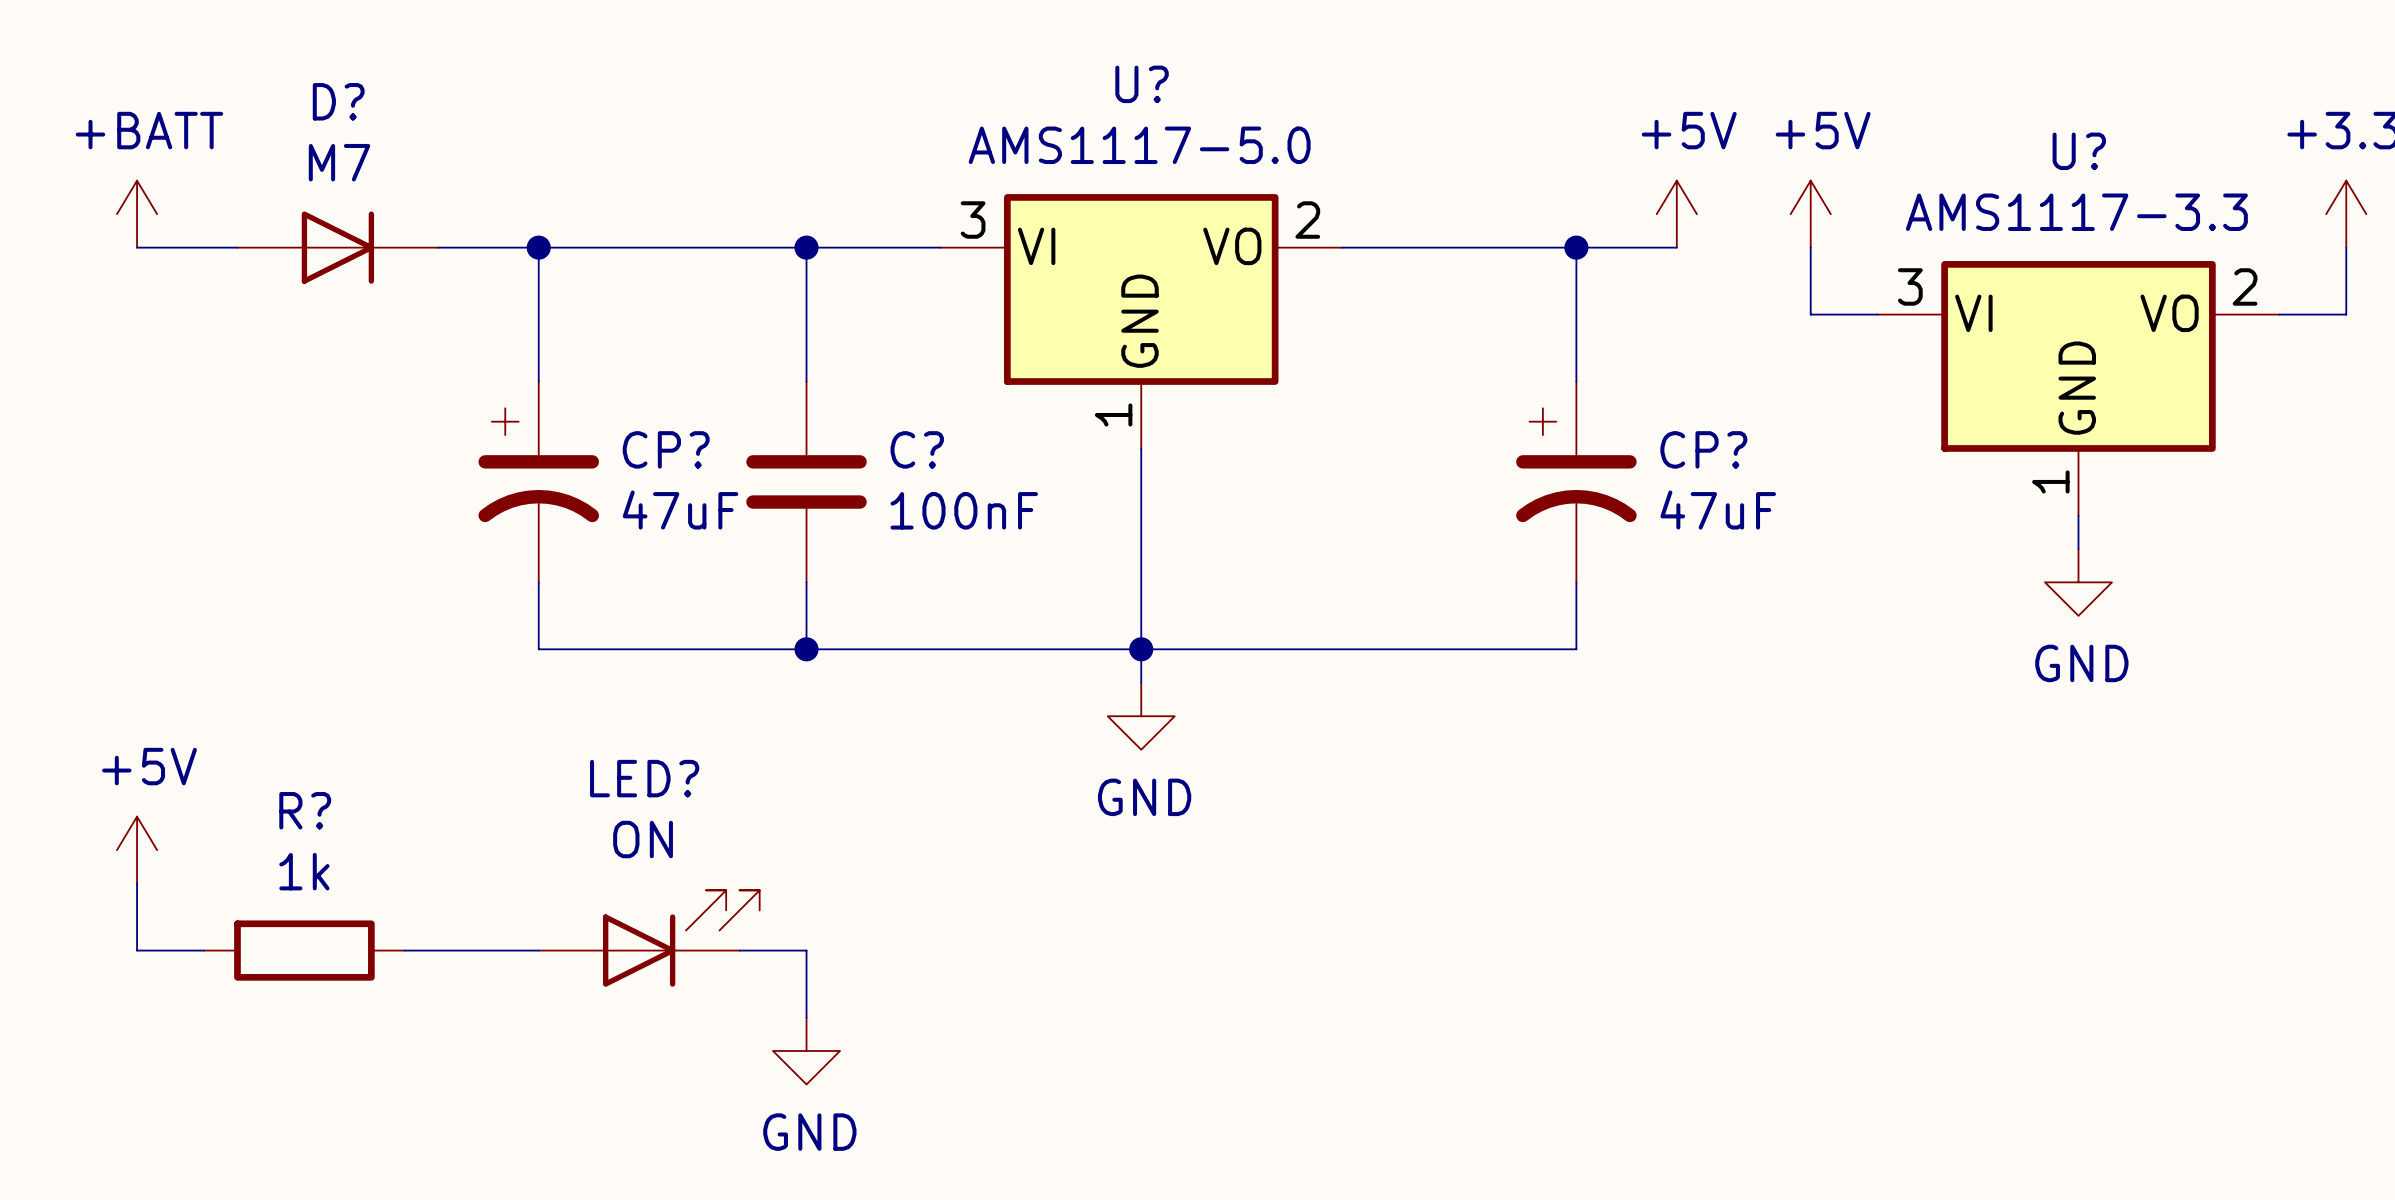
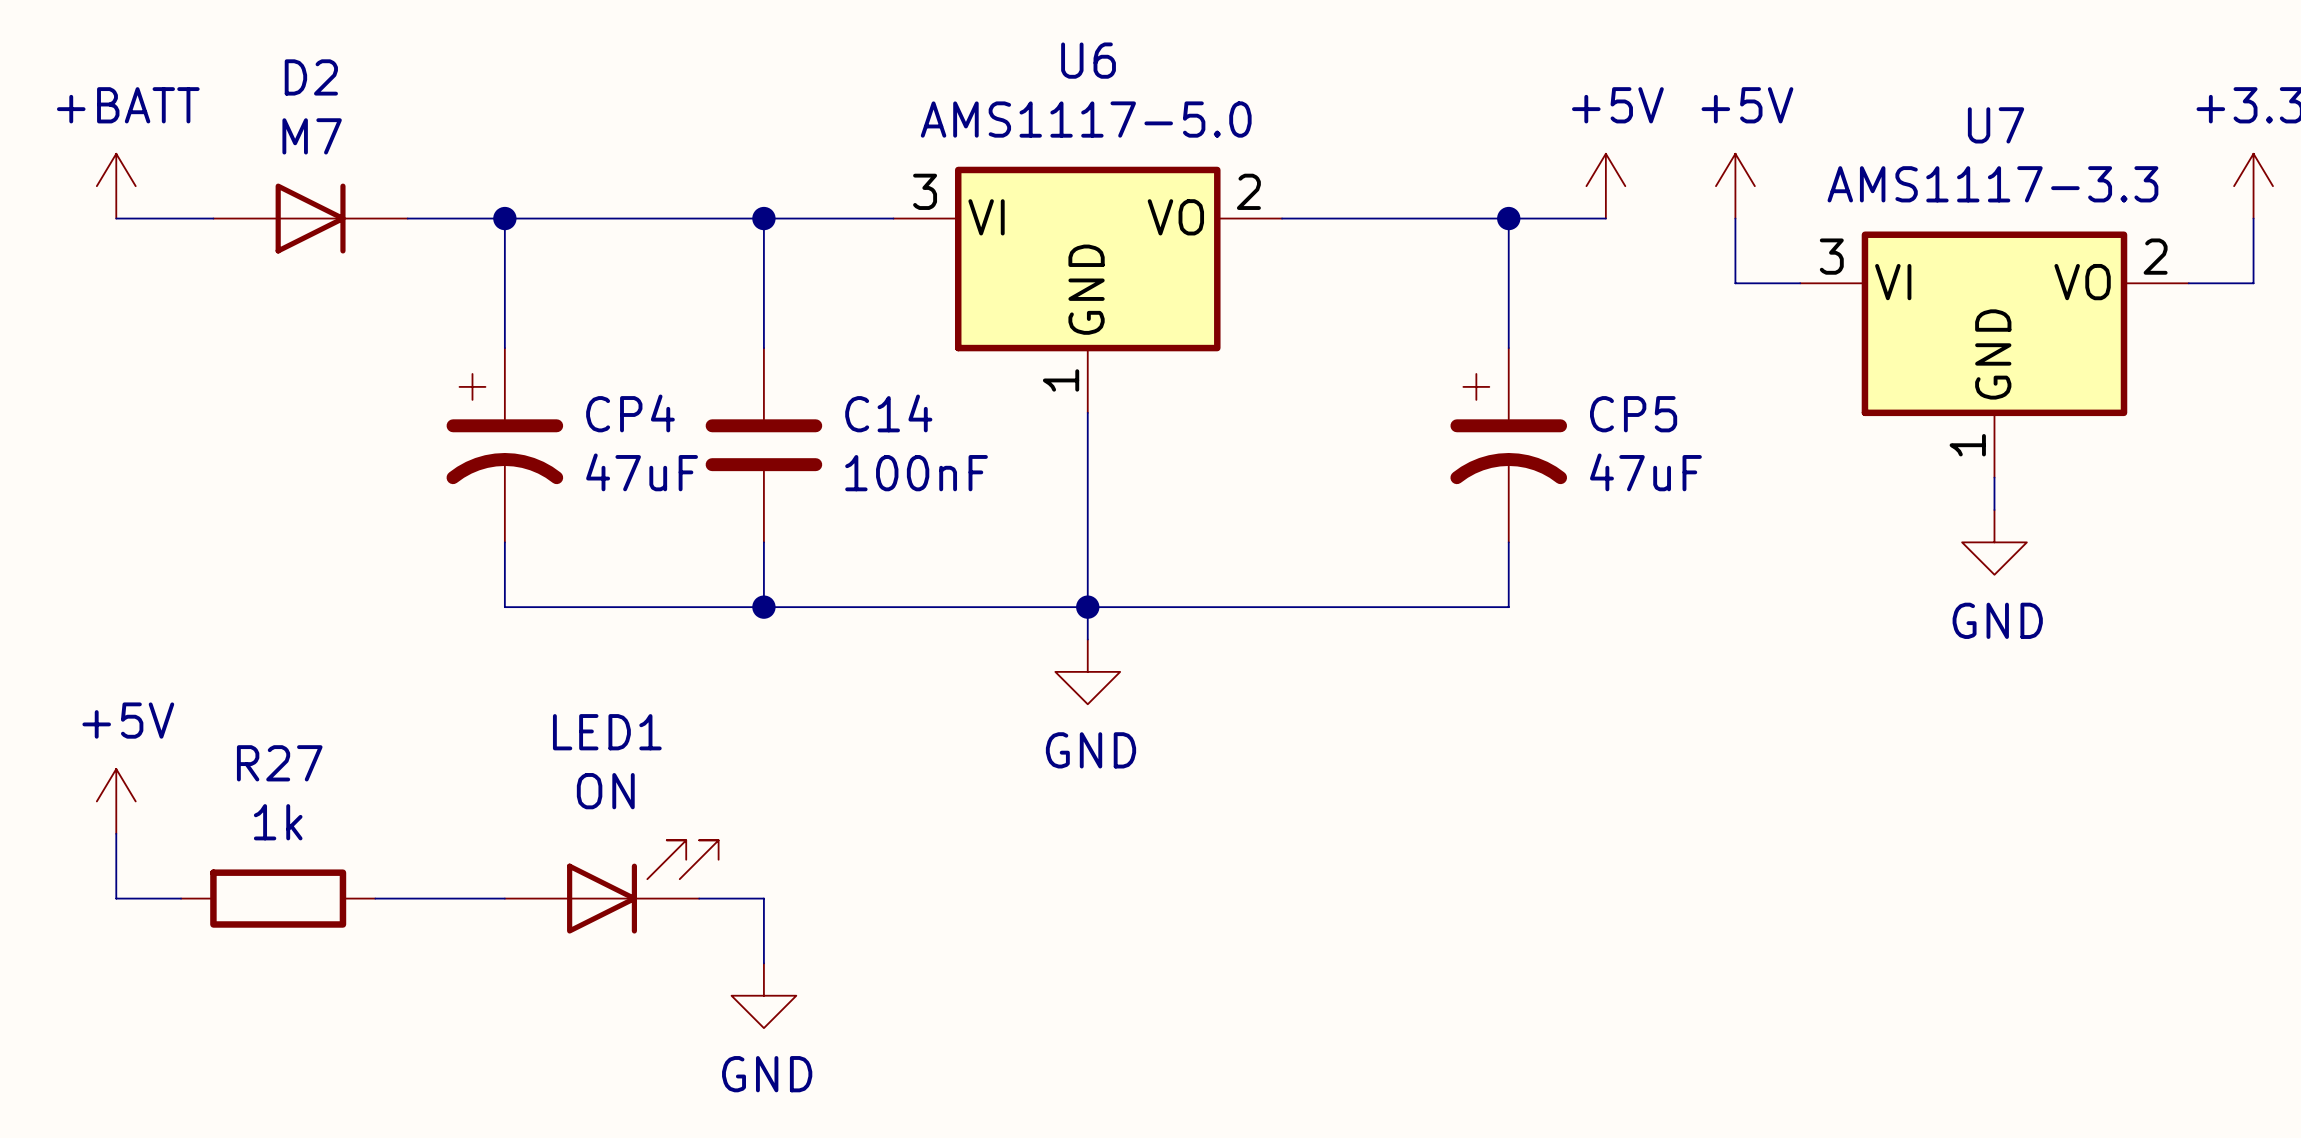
U? name: U? (1142, 84) -> U6 (1088, 60)
D? name: D? (338, 101) -> D2 (311, 77)
U? name: U? (2079, 151) -> U7 (1996, 125)
CP? name: CP? (666, 449) -> CP4 (630, 413)
C? name: C? (917, 449) -> C14 (888, 413)
CP? name: CP? (1703, 449) -> CP5 (1633, 414)
LED? name: LED? (644, 778) -> LED1 (607, 732)
R? name: R? (305, 810) -> R27 (279, 763)

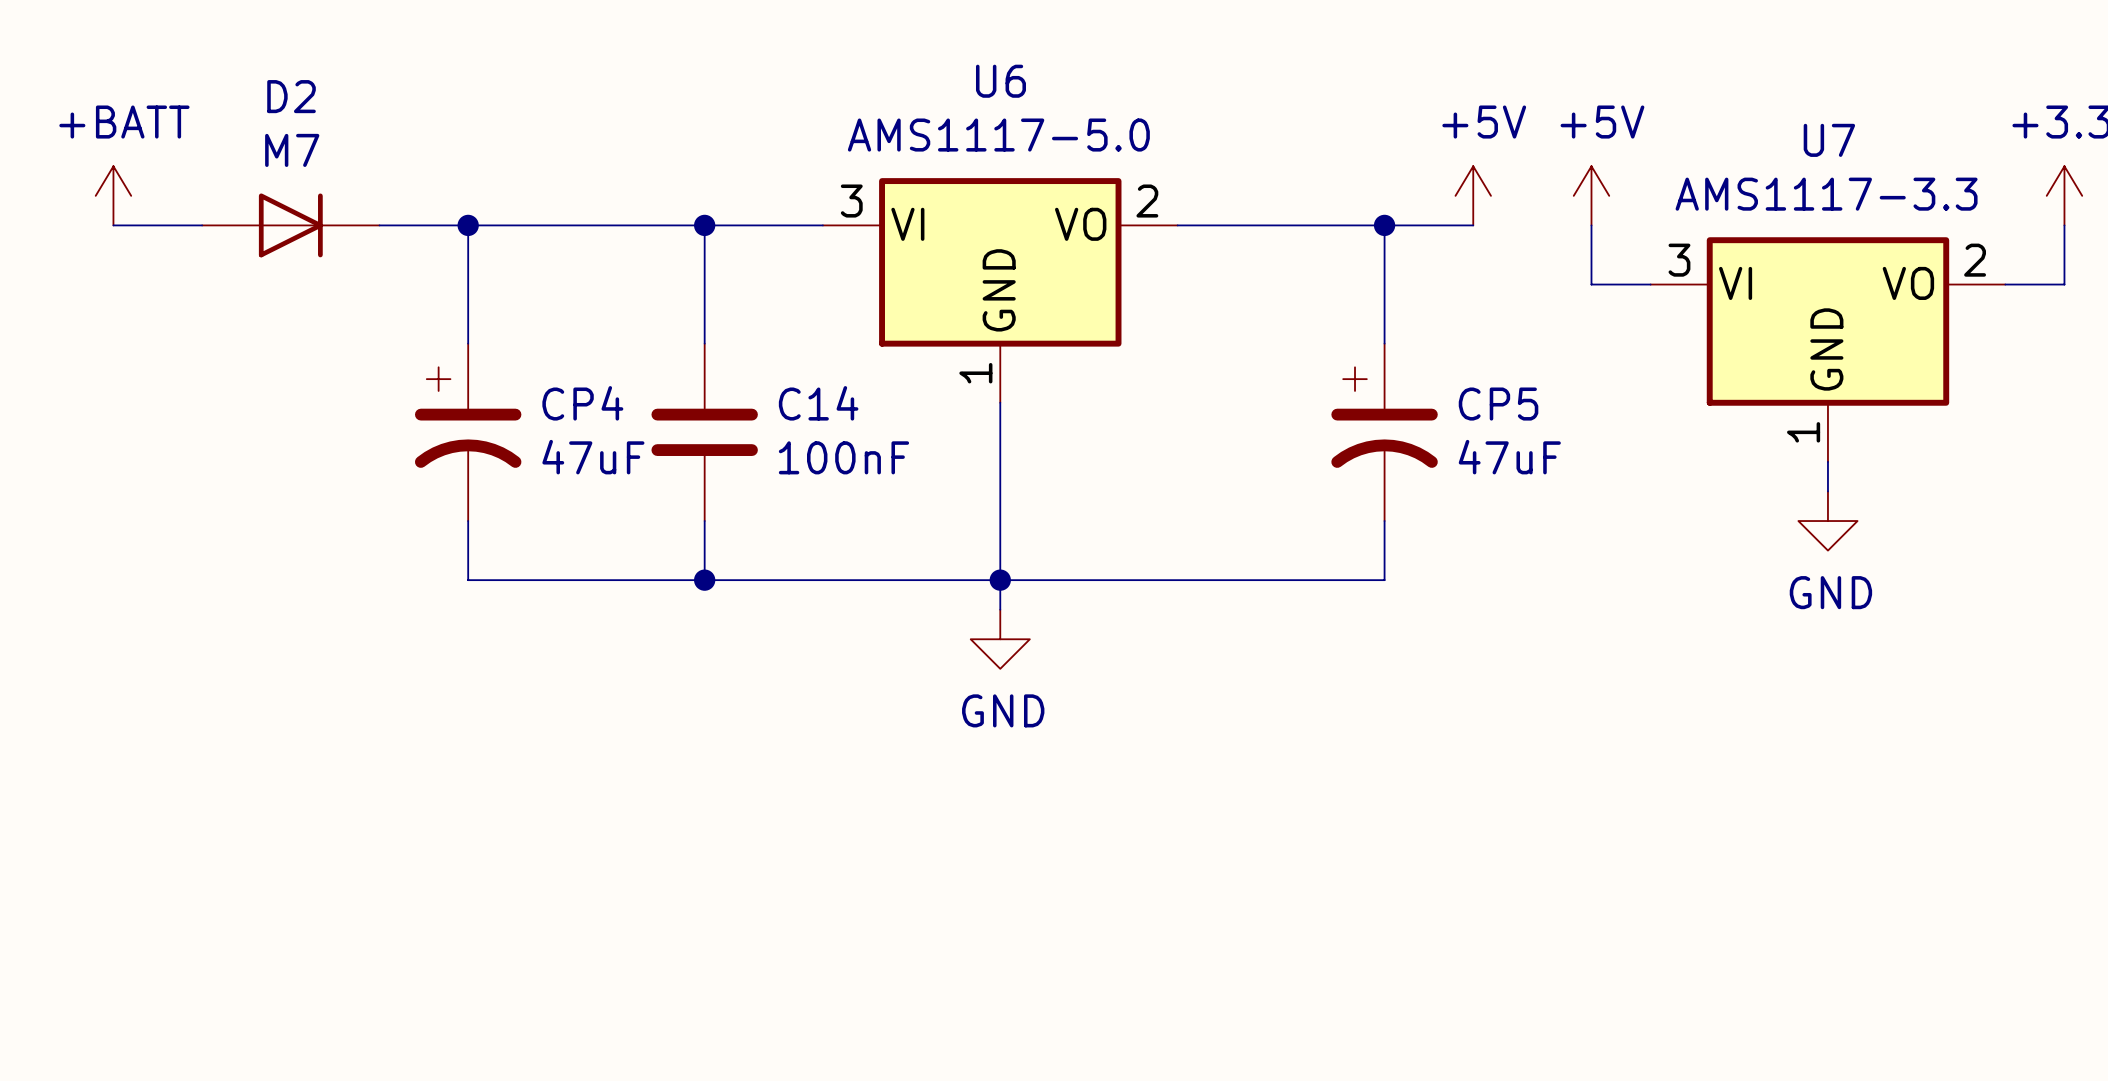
power symbol: +5V (116, 801) -> none
wire: (116, 833) (116, 898) (181, 898) -> none
LED1: ON (611, 886) -> none
R27: 1k (278, 898) -> none
wire: (375, 898) (504, 898) -> none
wire: (699, 898) (763, 898) (763, 963) -> none
power symbol: GND (763, 995) -> none

